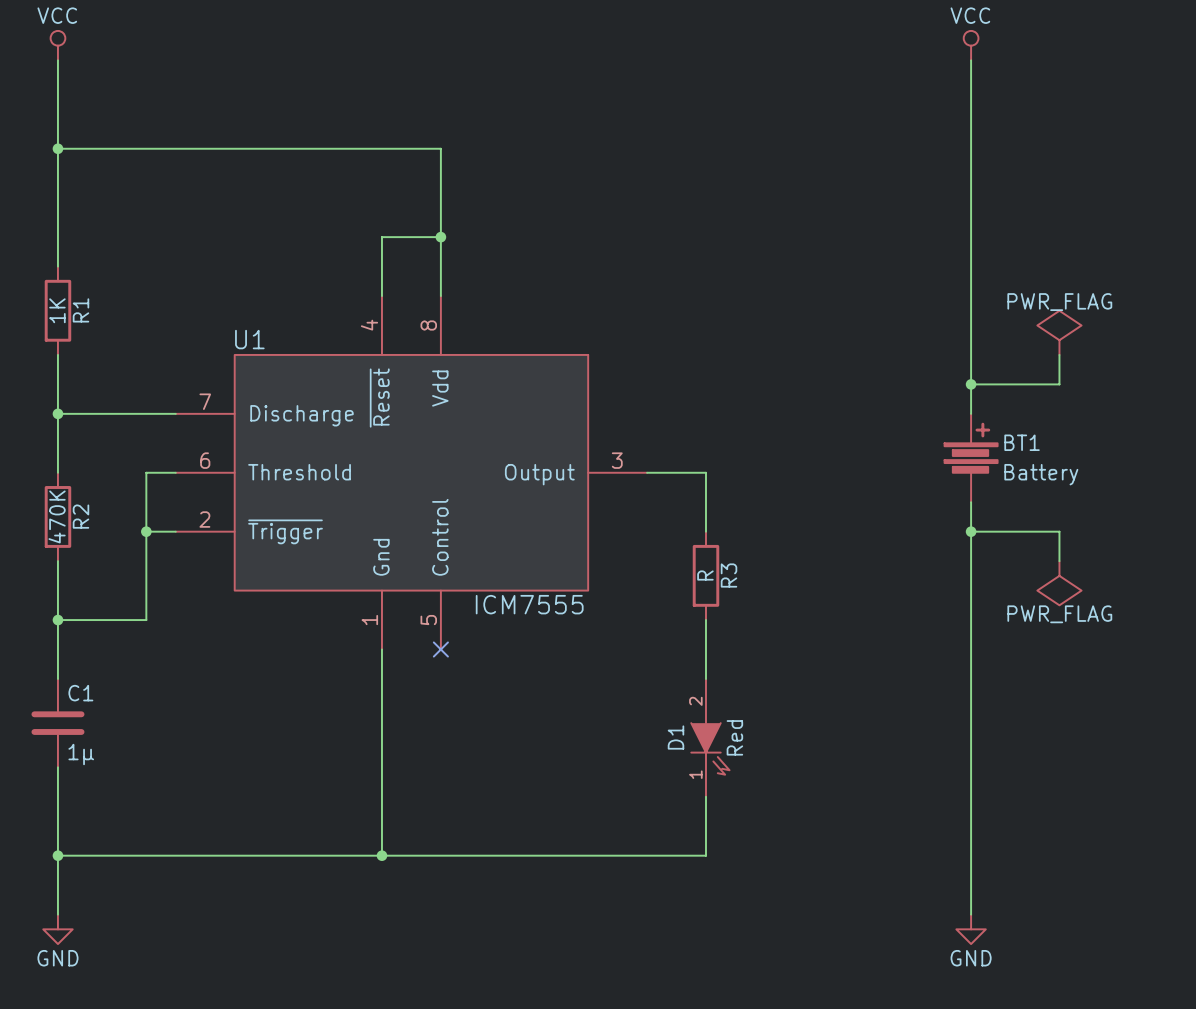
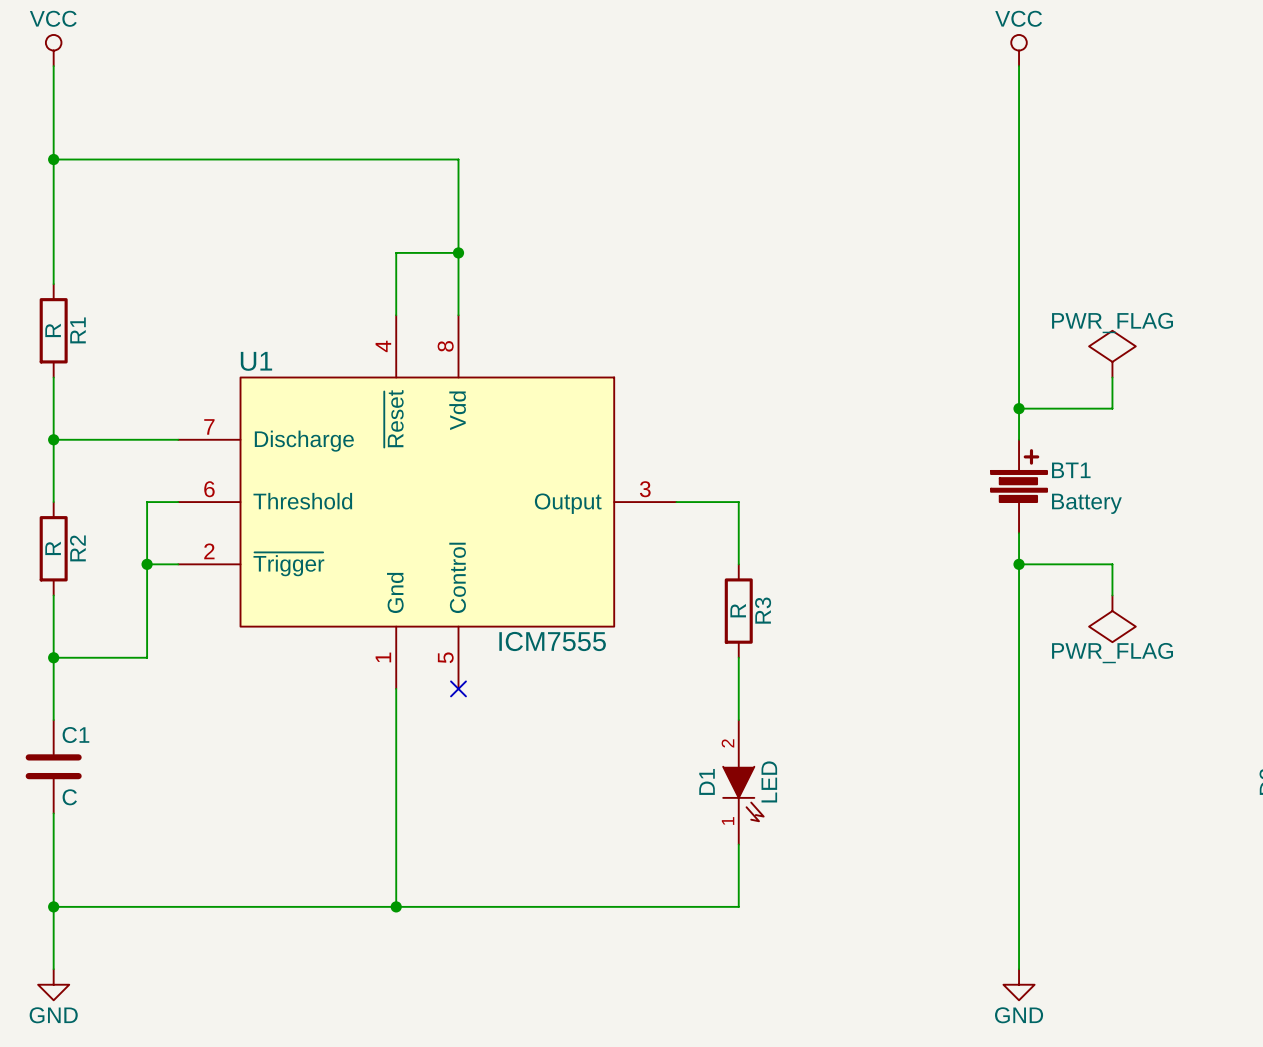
R1 value: 1K (57, 310) -> R (53, 330)
R2 value: 470K (57, 516) -> R (53, 548)
D1 value: Red (734, 737) -> LED (769, 781)
C1 value: 1µ (81, 754) -> C (69, 797)

